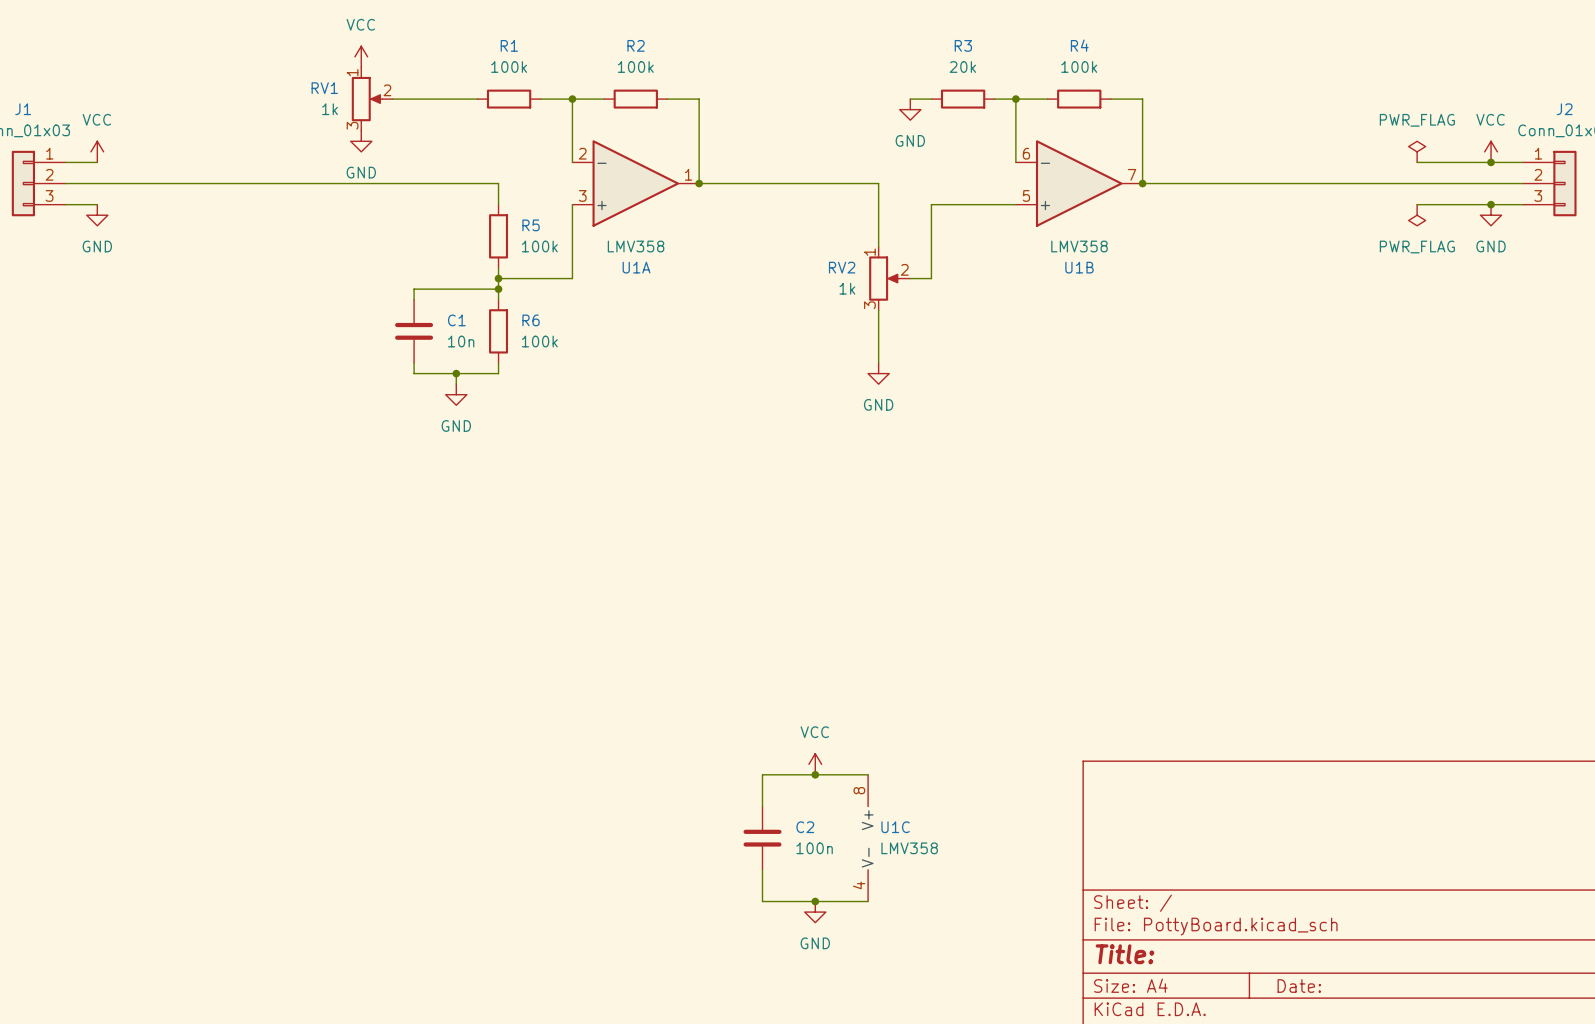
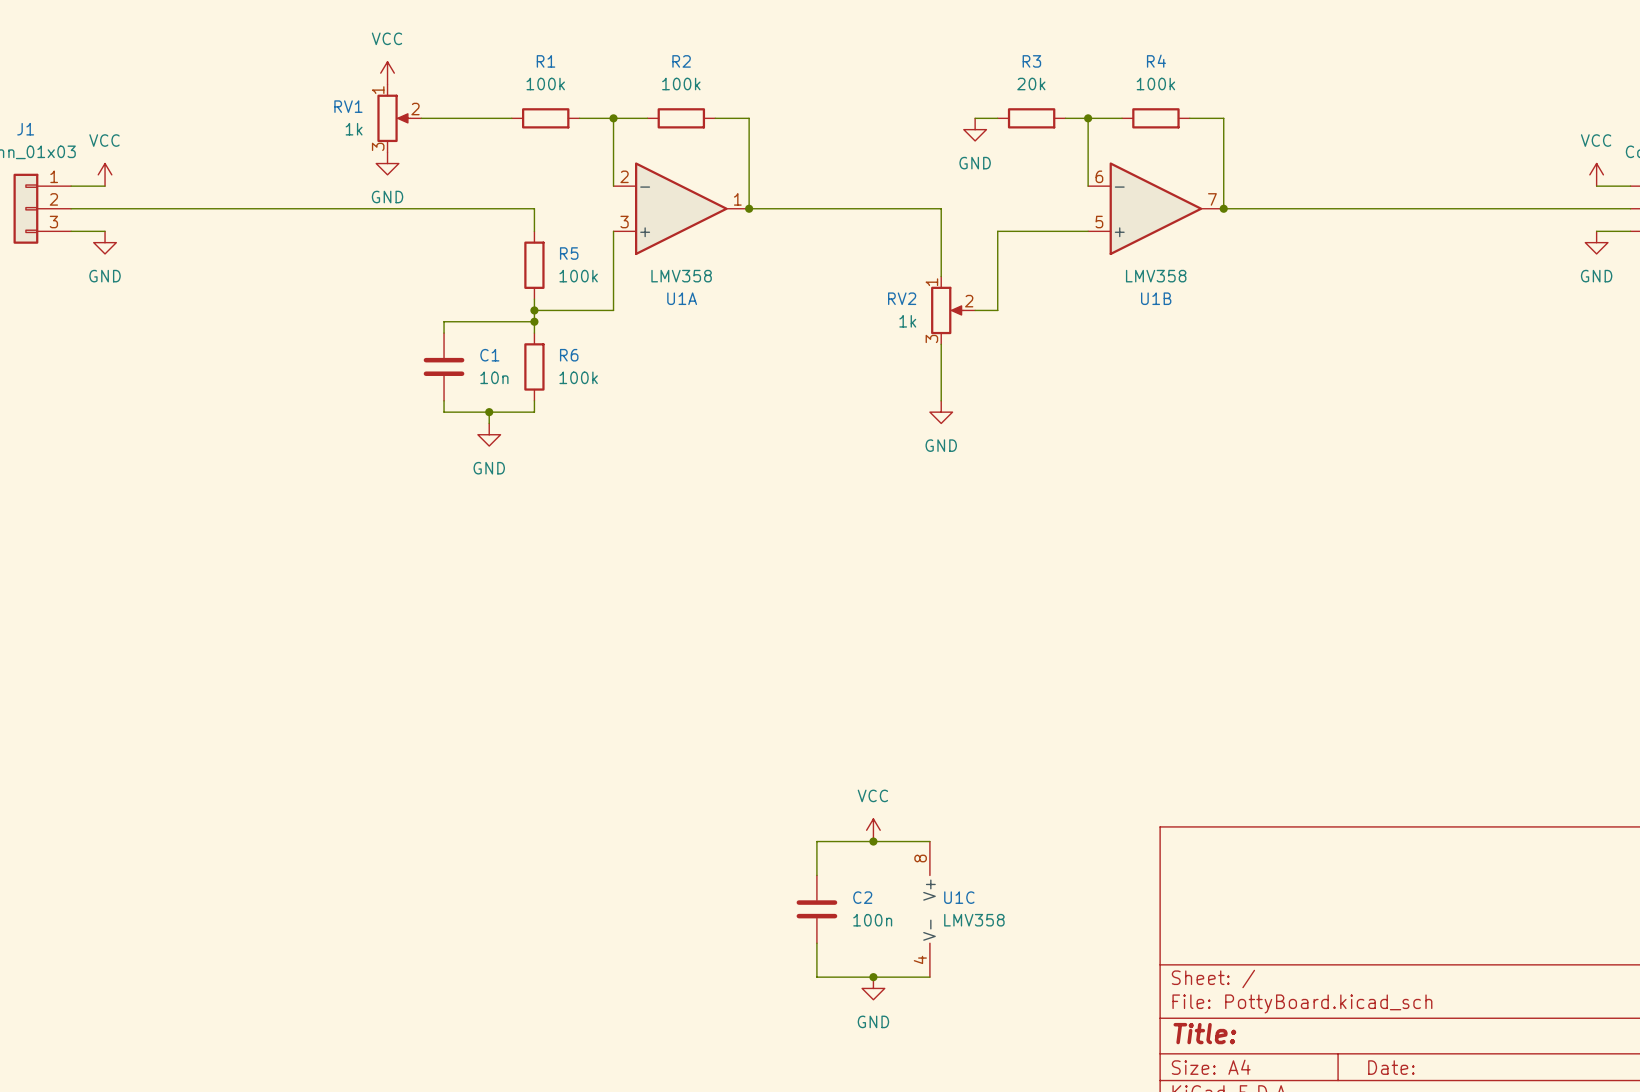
power symbol: PWR_FLAG (1417, 151) -> none
wire: (1417, 162) (1491, 162) -> none
junction: (1491, 162) -> none
wire: (1417, 204) (1491, 204) -> none
junction: (1491, 204) -> none
power symbol: PWR_FLAG (1417, 215) -> none

